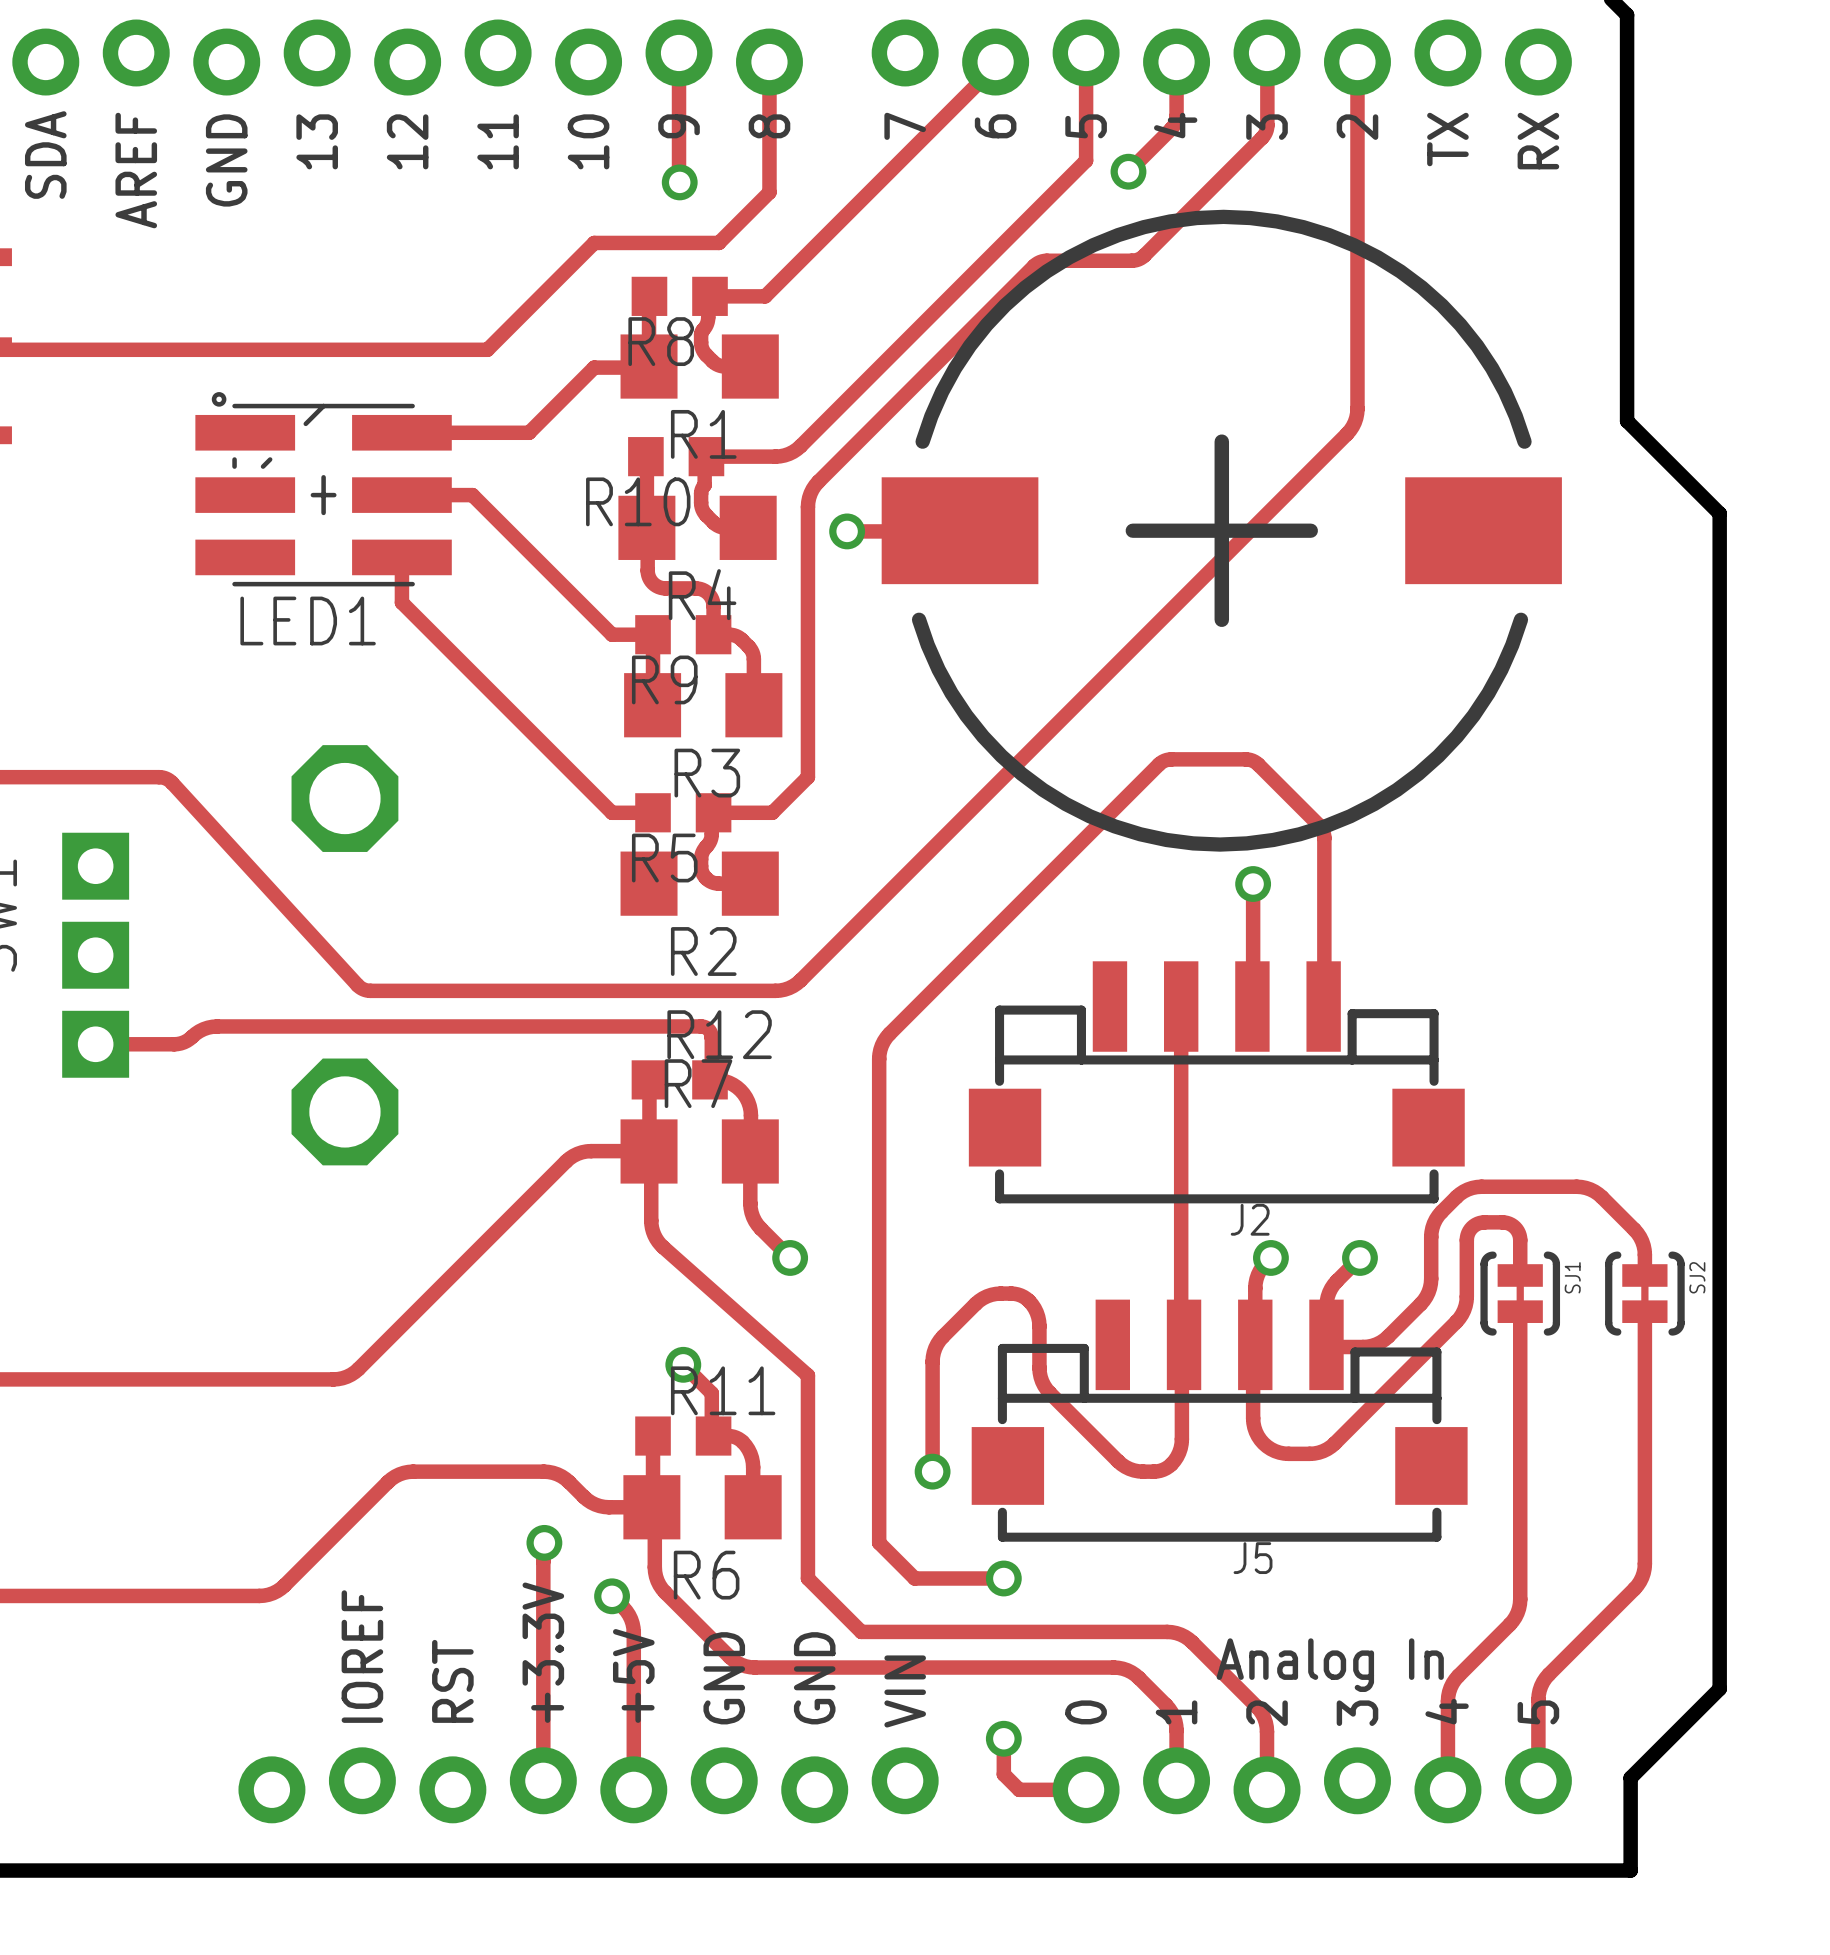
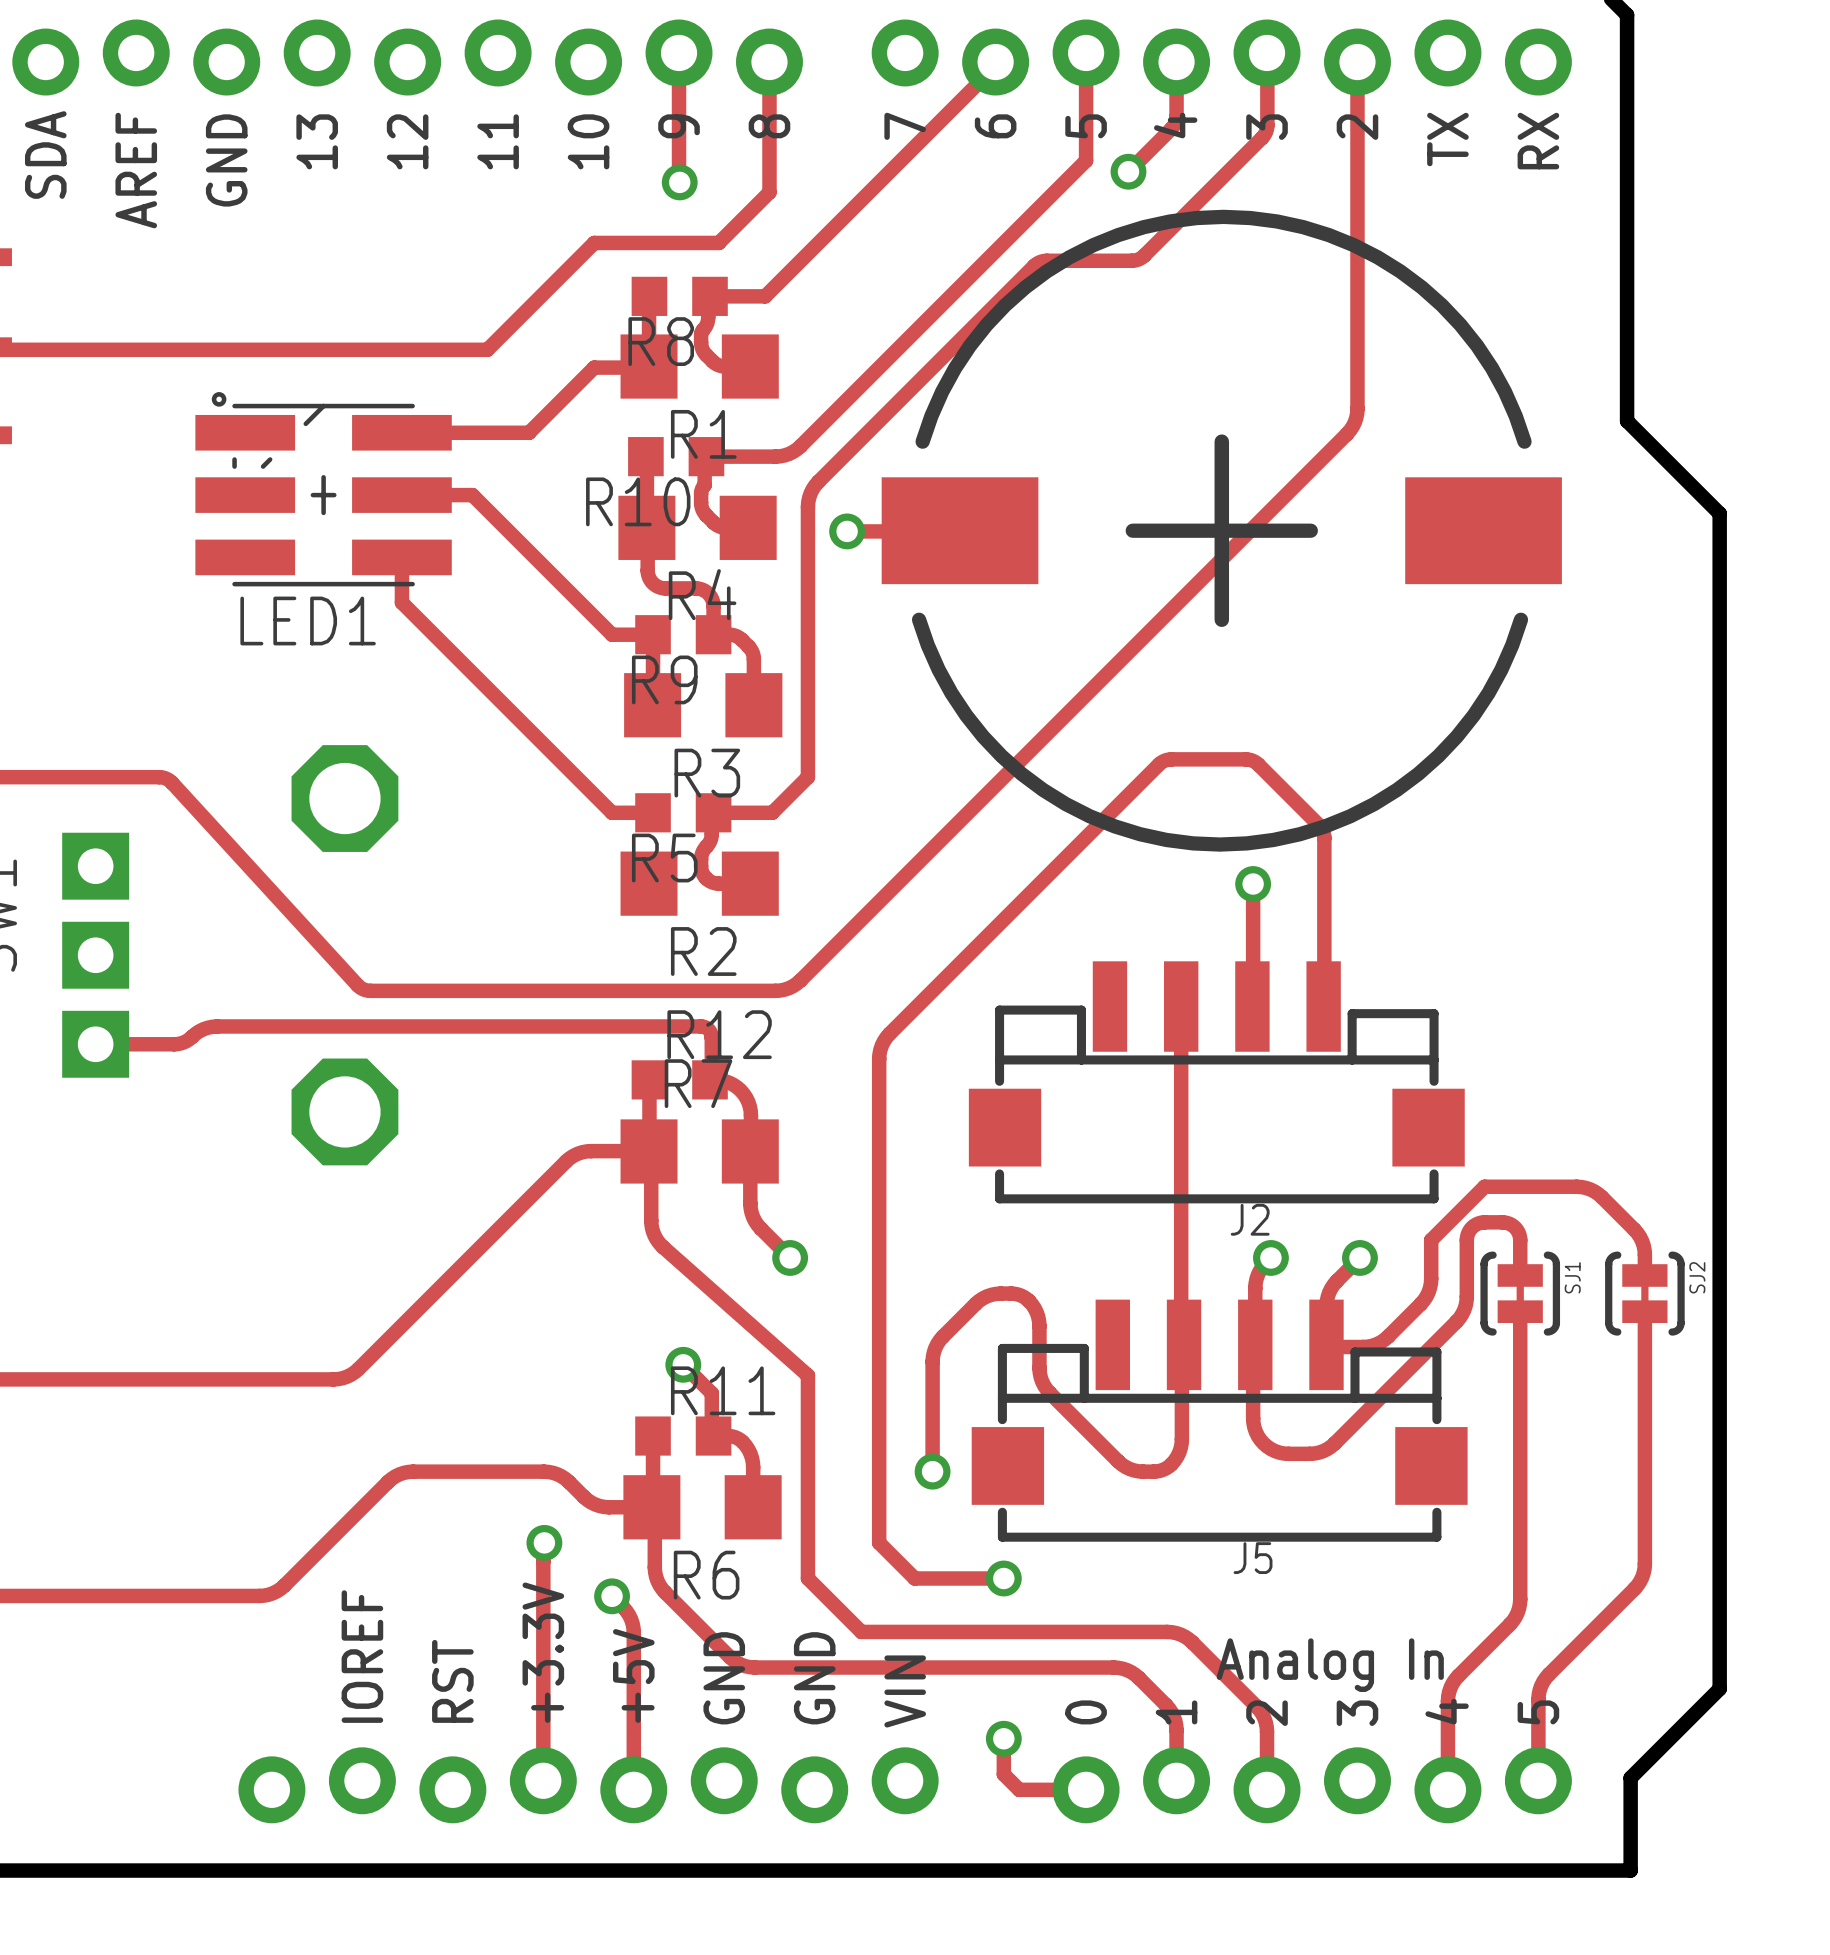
track: (1484, 1186) (1467, 1189) (1456, 1197) (1435, 1219) (1432, 1227) (1431, 1240) -> (1484, 1186) (1431, 1240)

